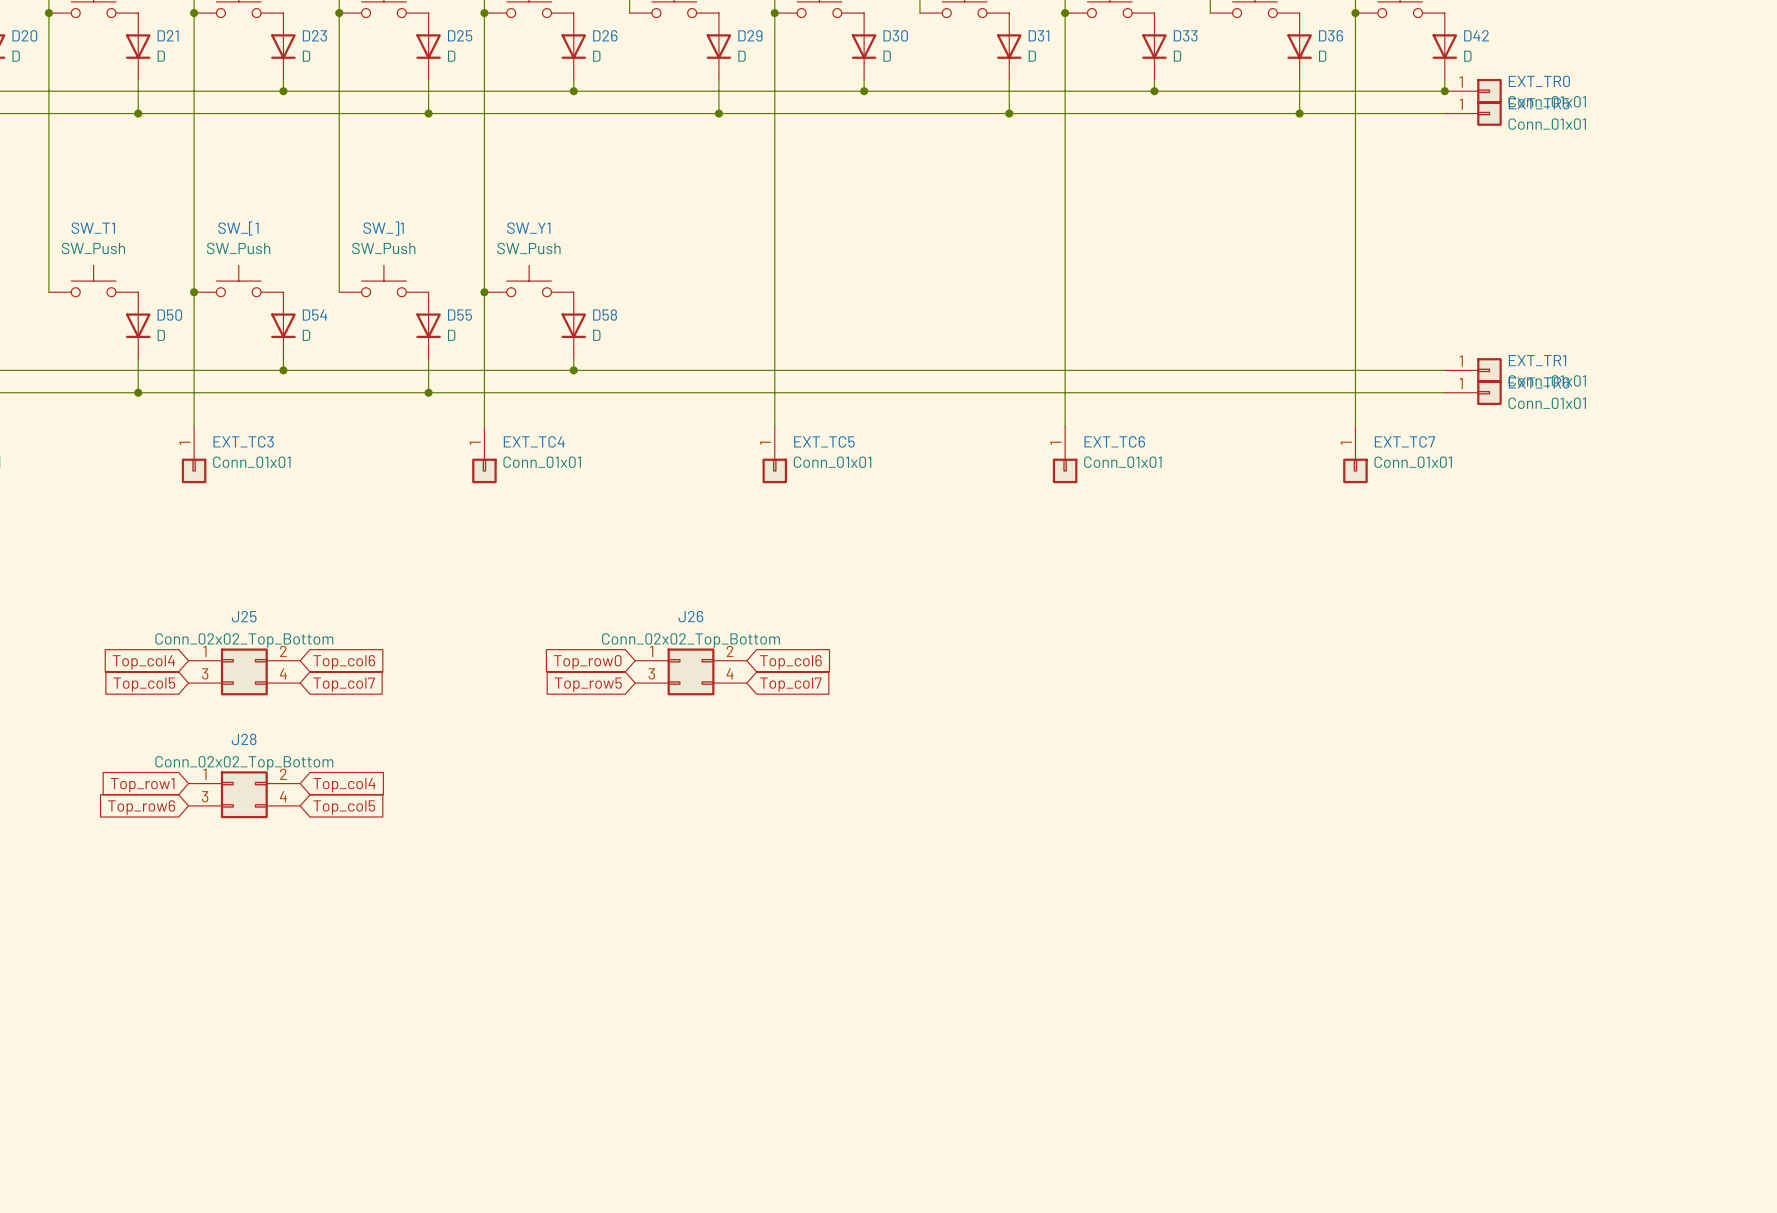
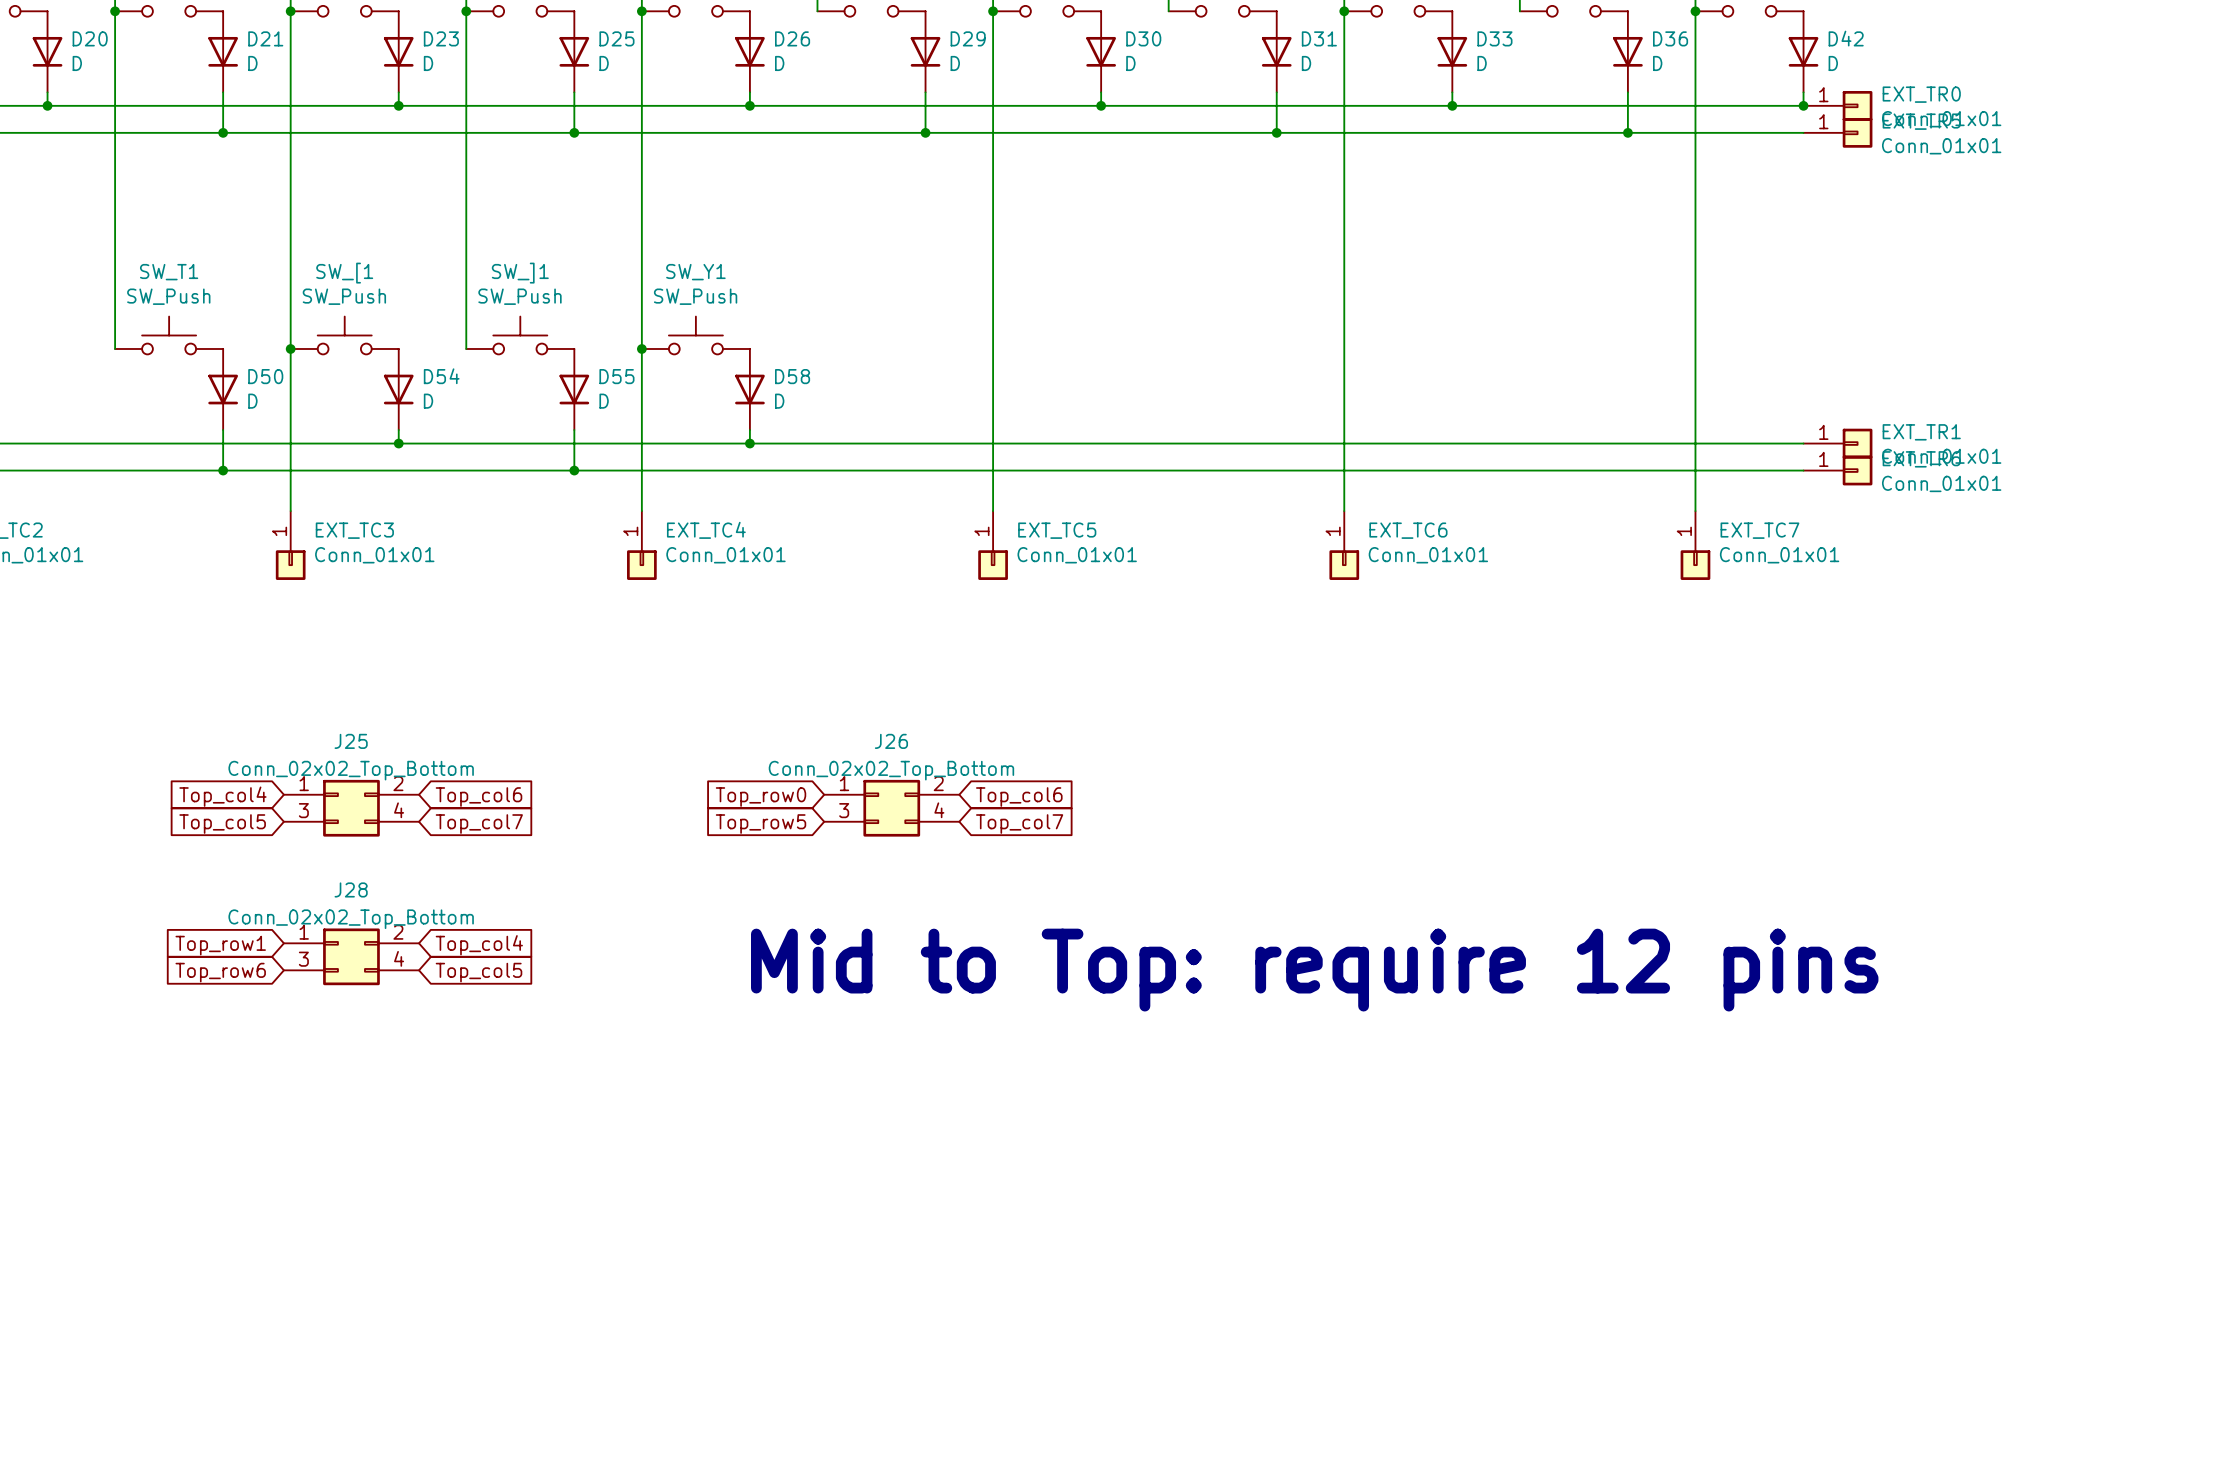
text: none -> Mid to Top: require 12 pins (1314, 970)

